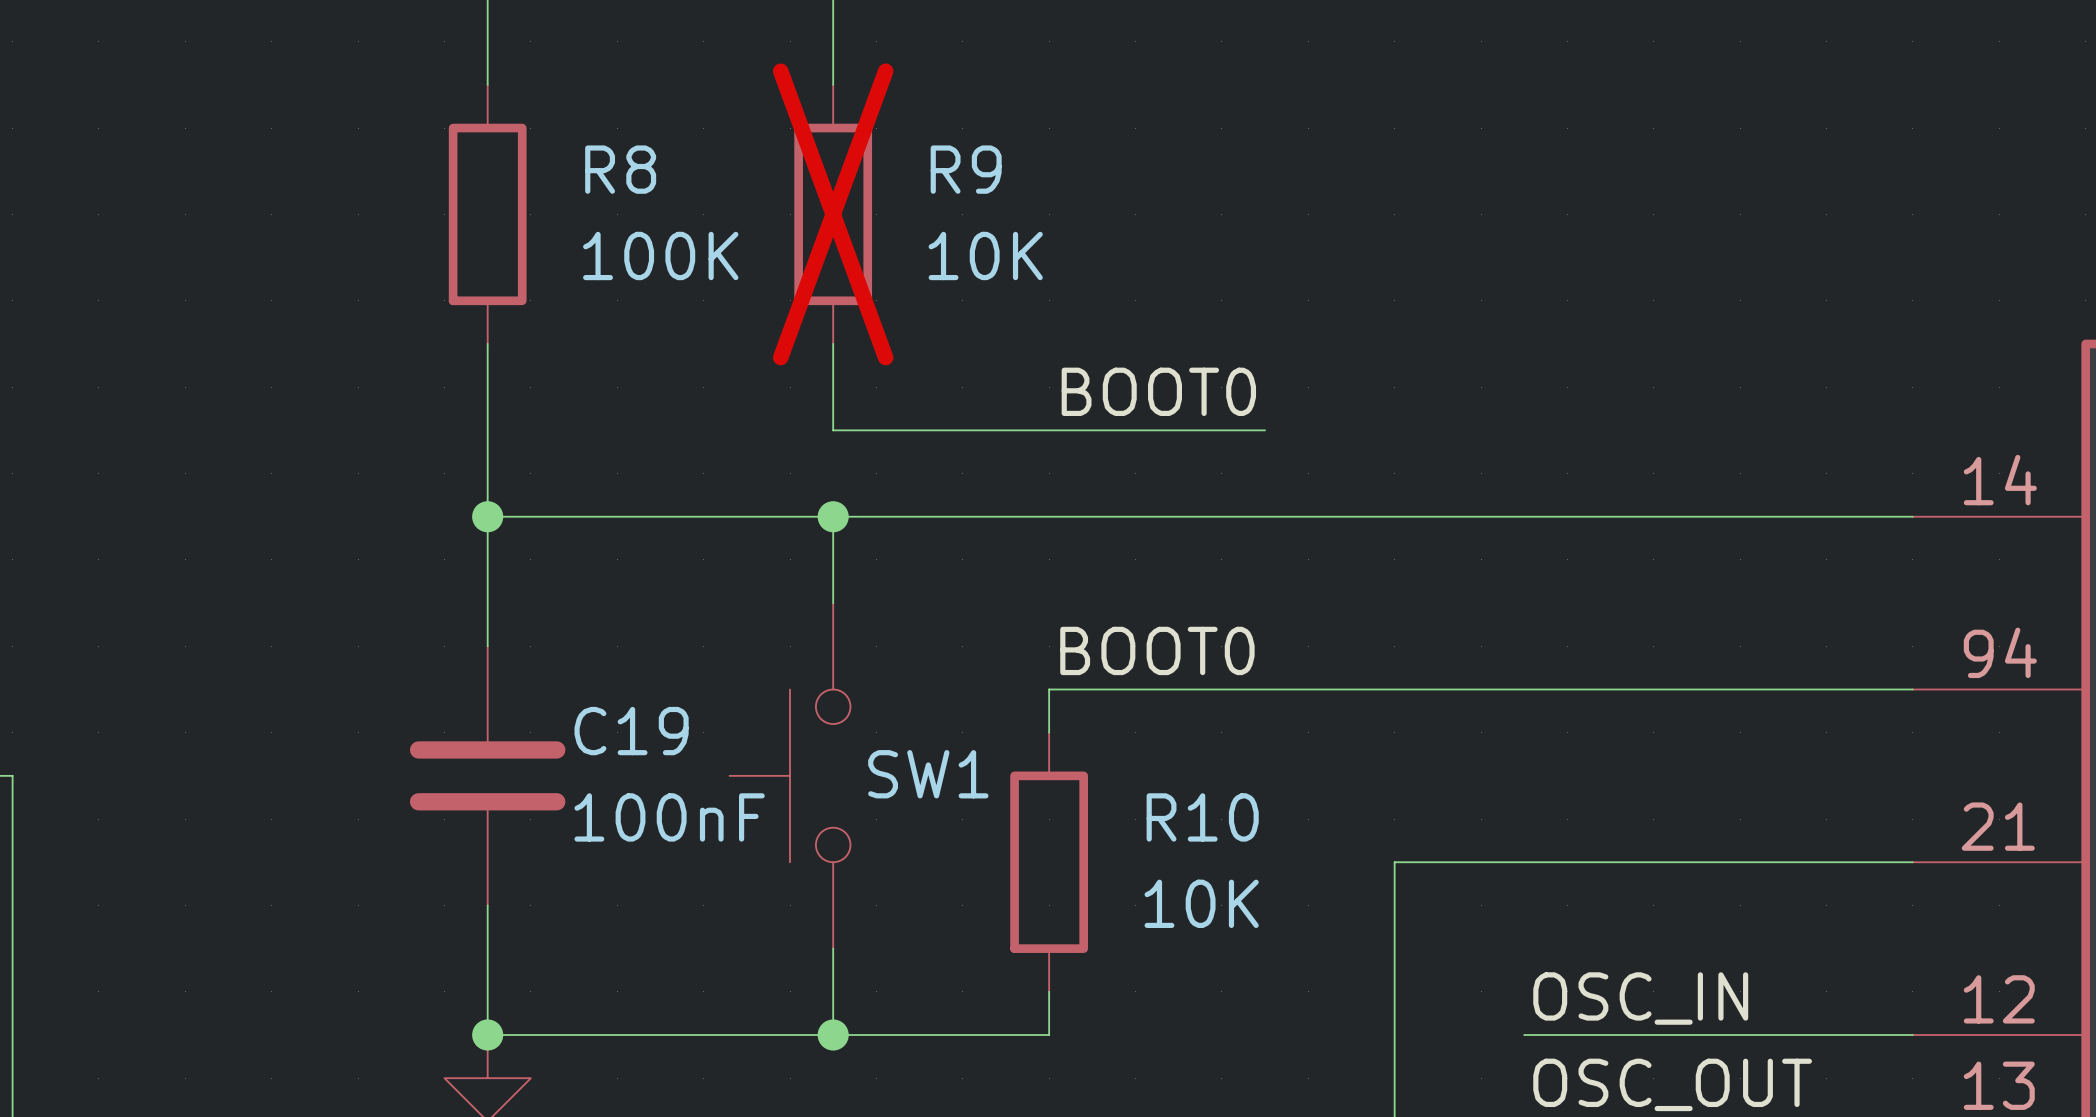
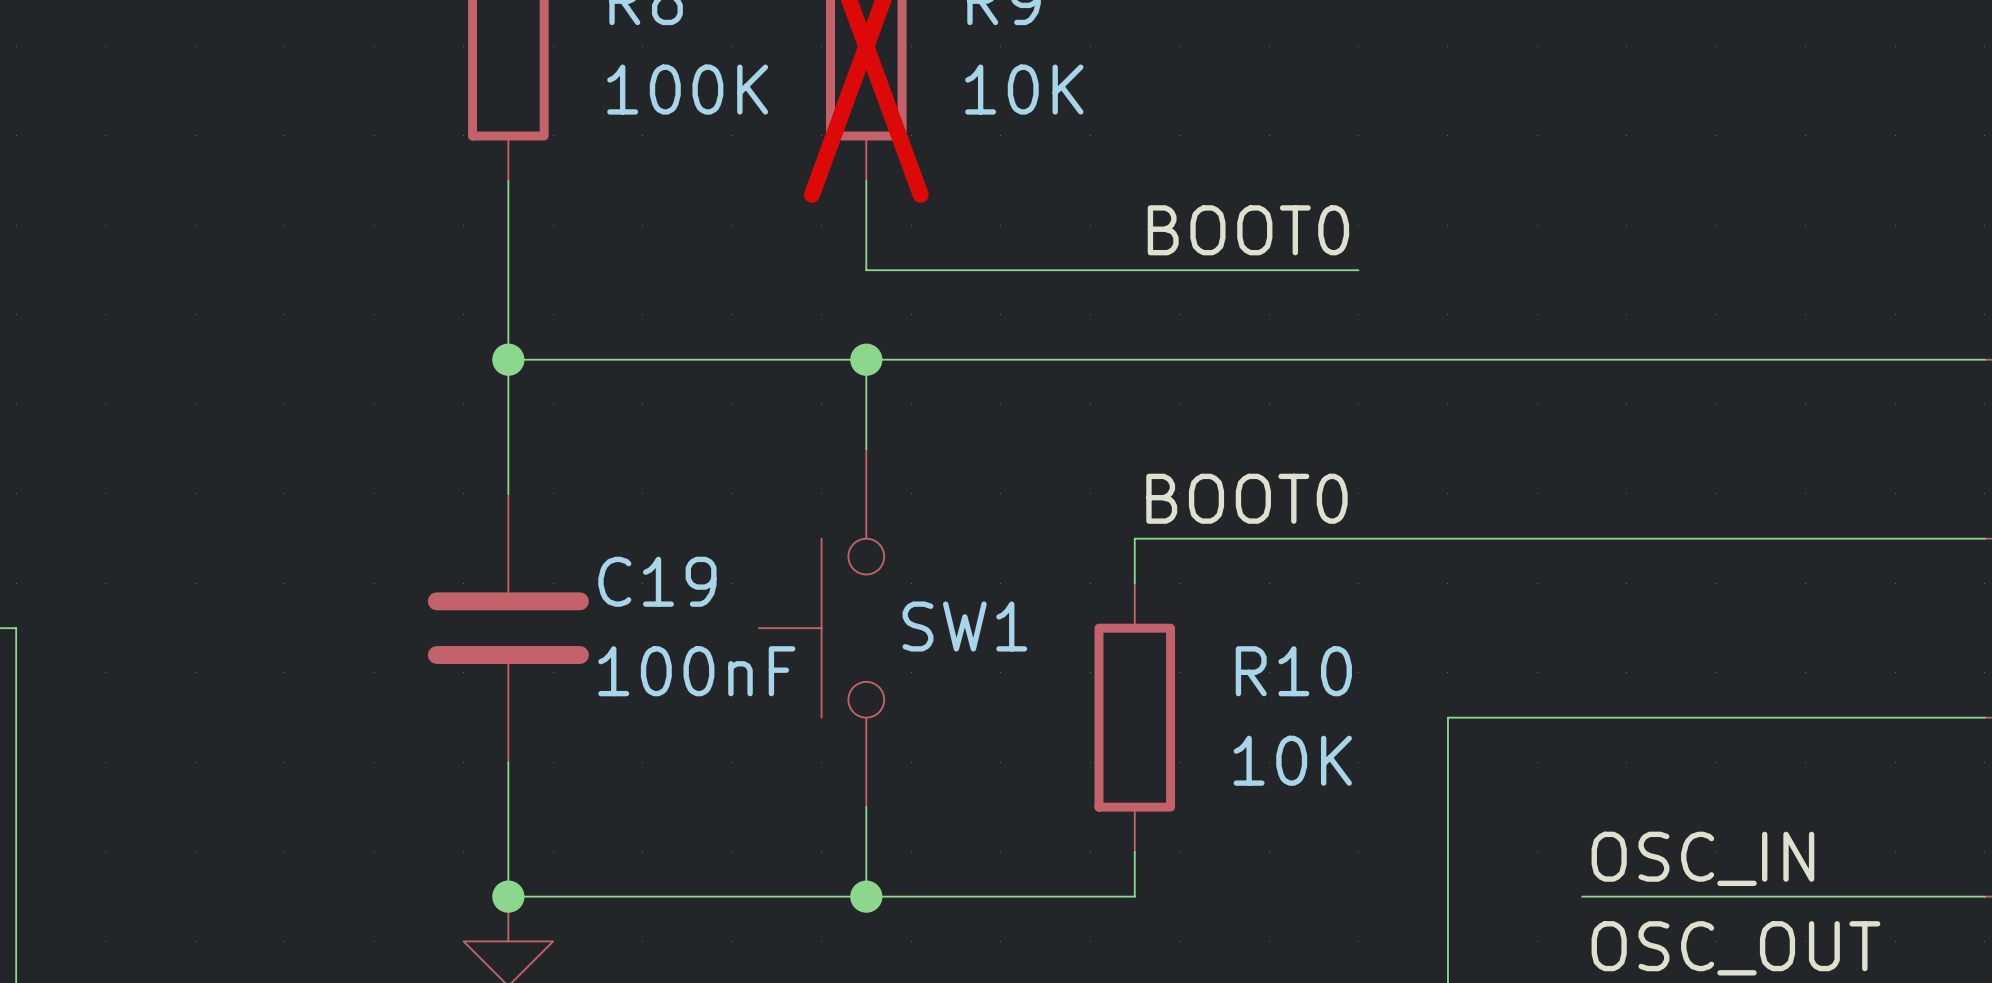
label position: BOOT0 (1158, 391) -> BOOT0 (1248, 230)
wire: none -> (1313, 270) (1358, 270)
label position: BOOT0 (1157, 650) -> BOOT0 (1246, 498)
wire: (1092, 689) (1049, 689) (1049, 732) -> (1134, 538) (1134, 583)
R10 position: (1049, 862) -> (1134, 717)
wire: (1049, 991) (1049, 1035) -> (1134, 851) (1134, 896) (1090, 896)

